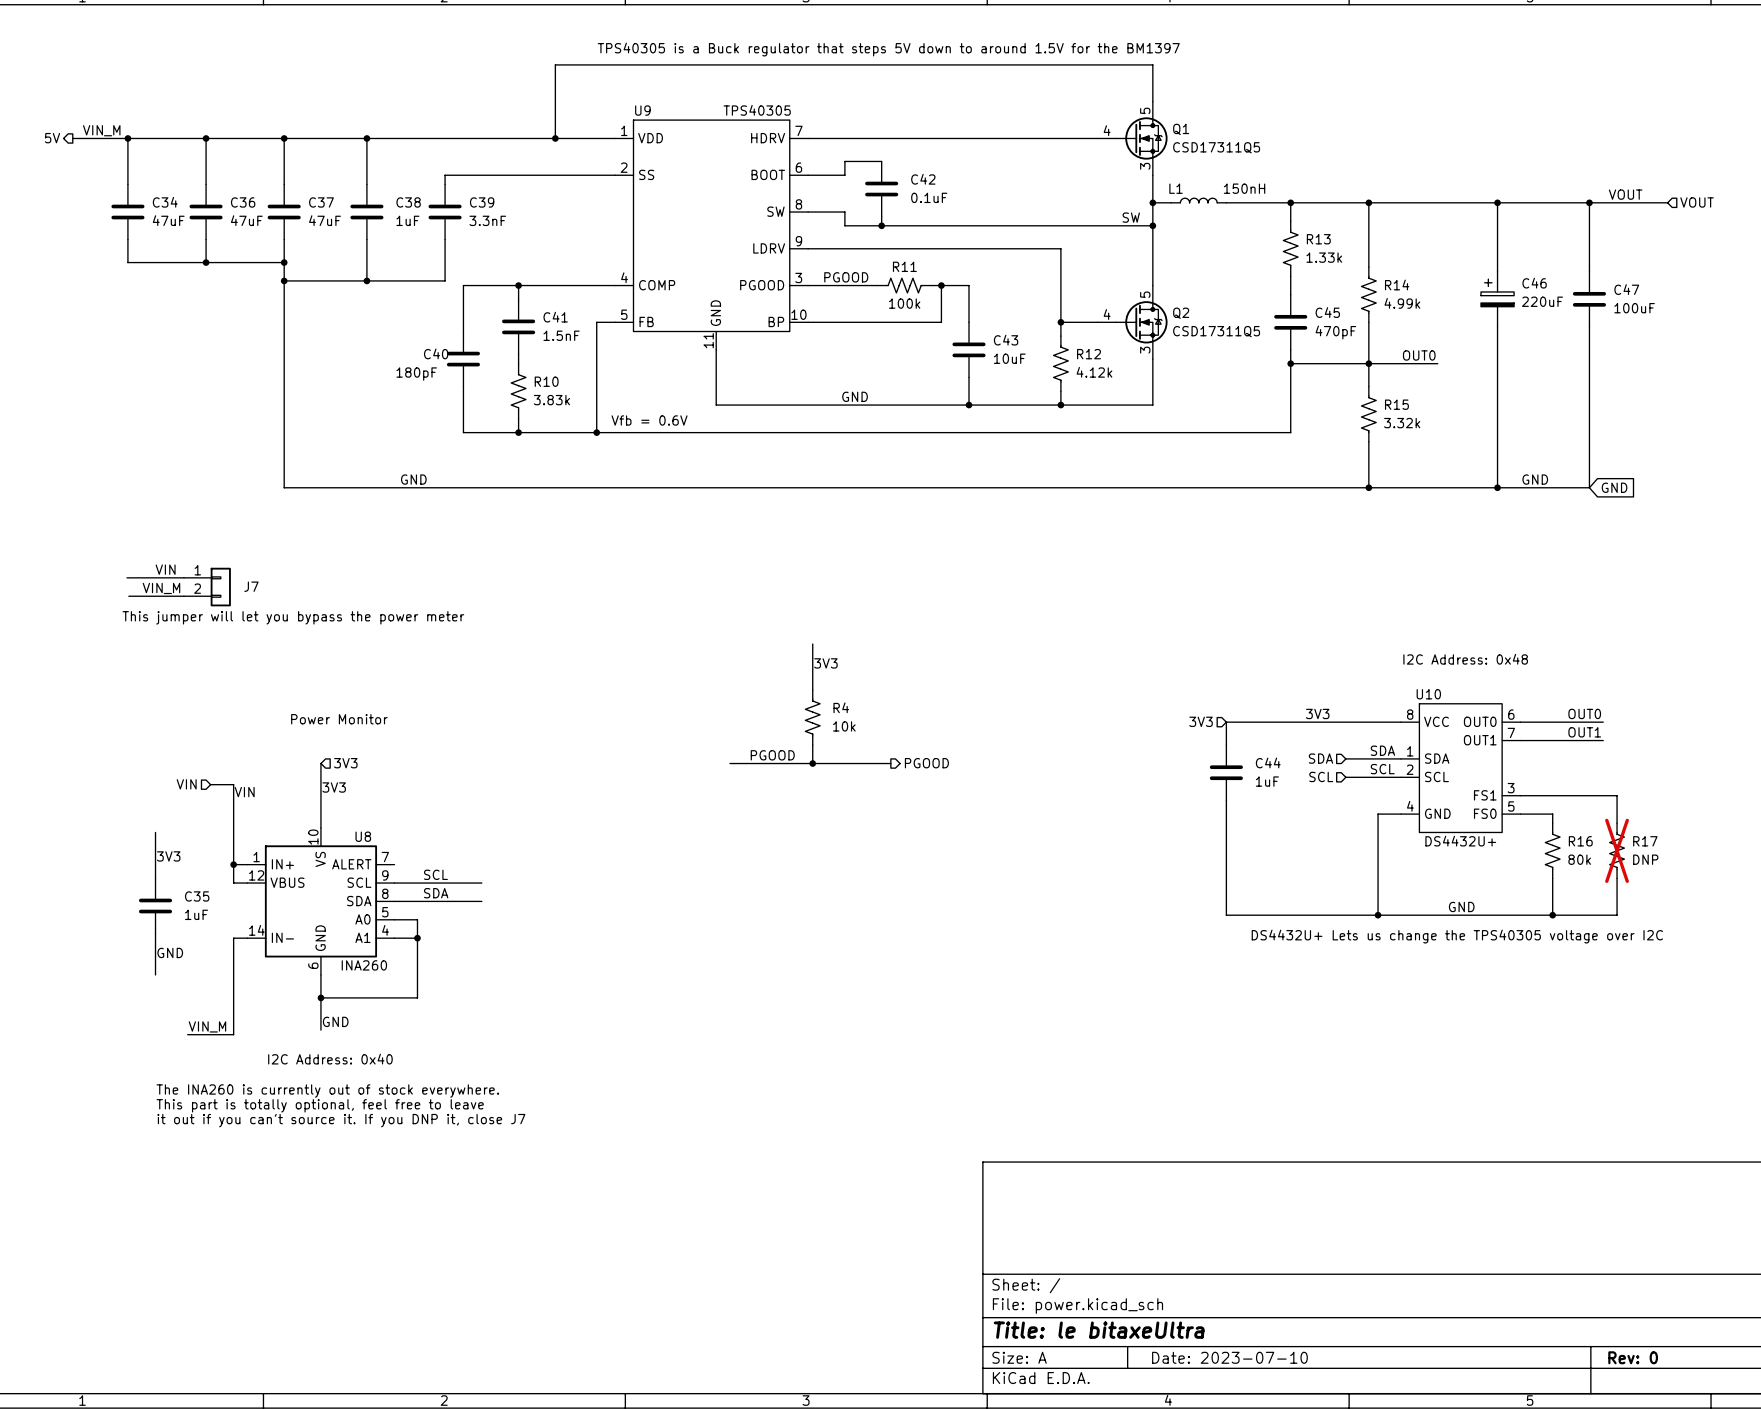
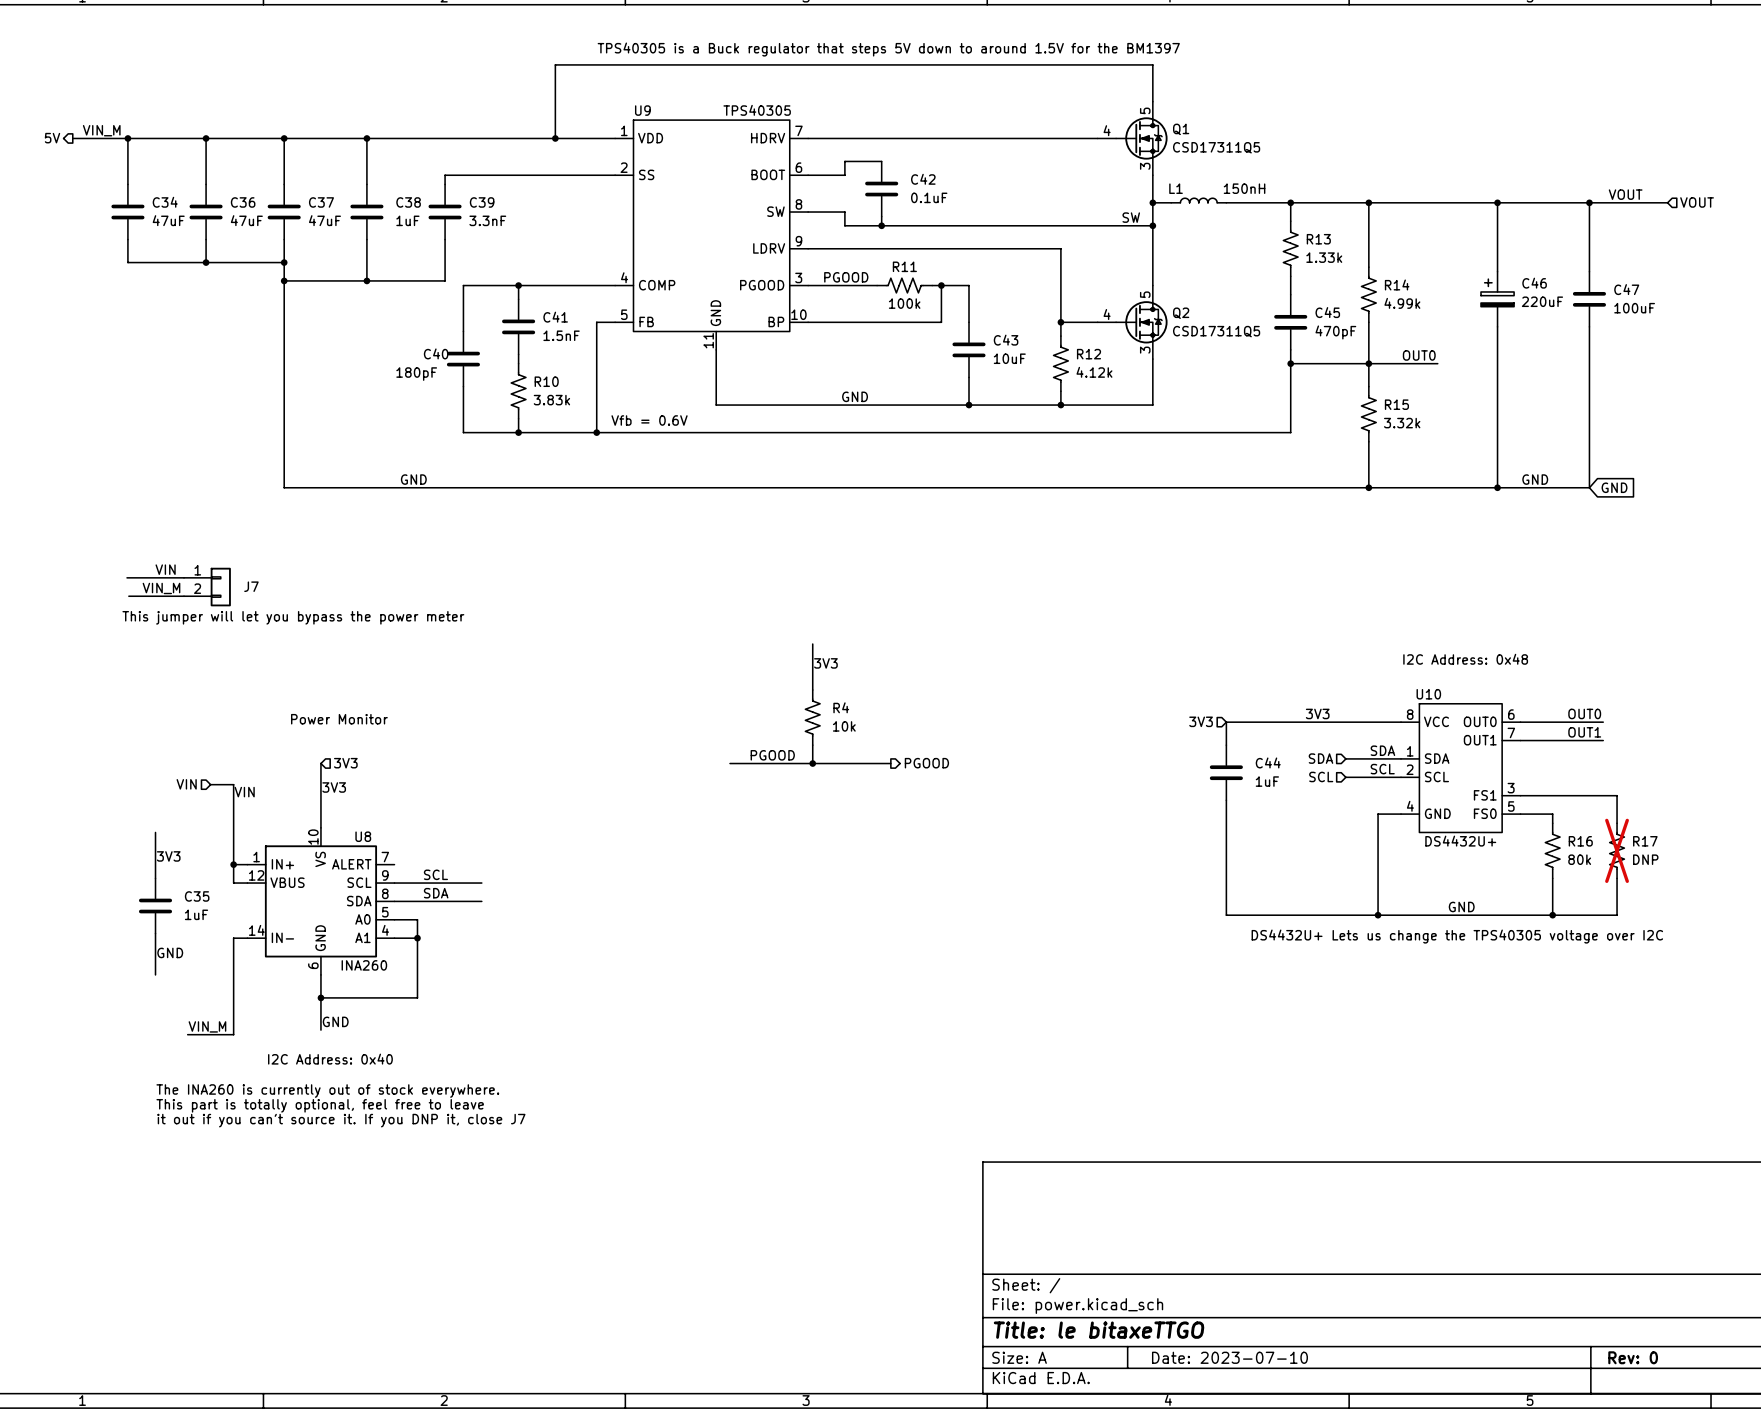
title block: Title: le bitaxeUltra (1099, 1330) -> Title: le bitaxeTTGO (1099, 1330)

